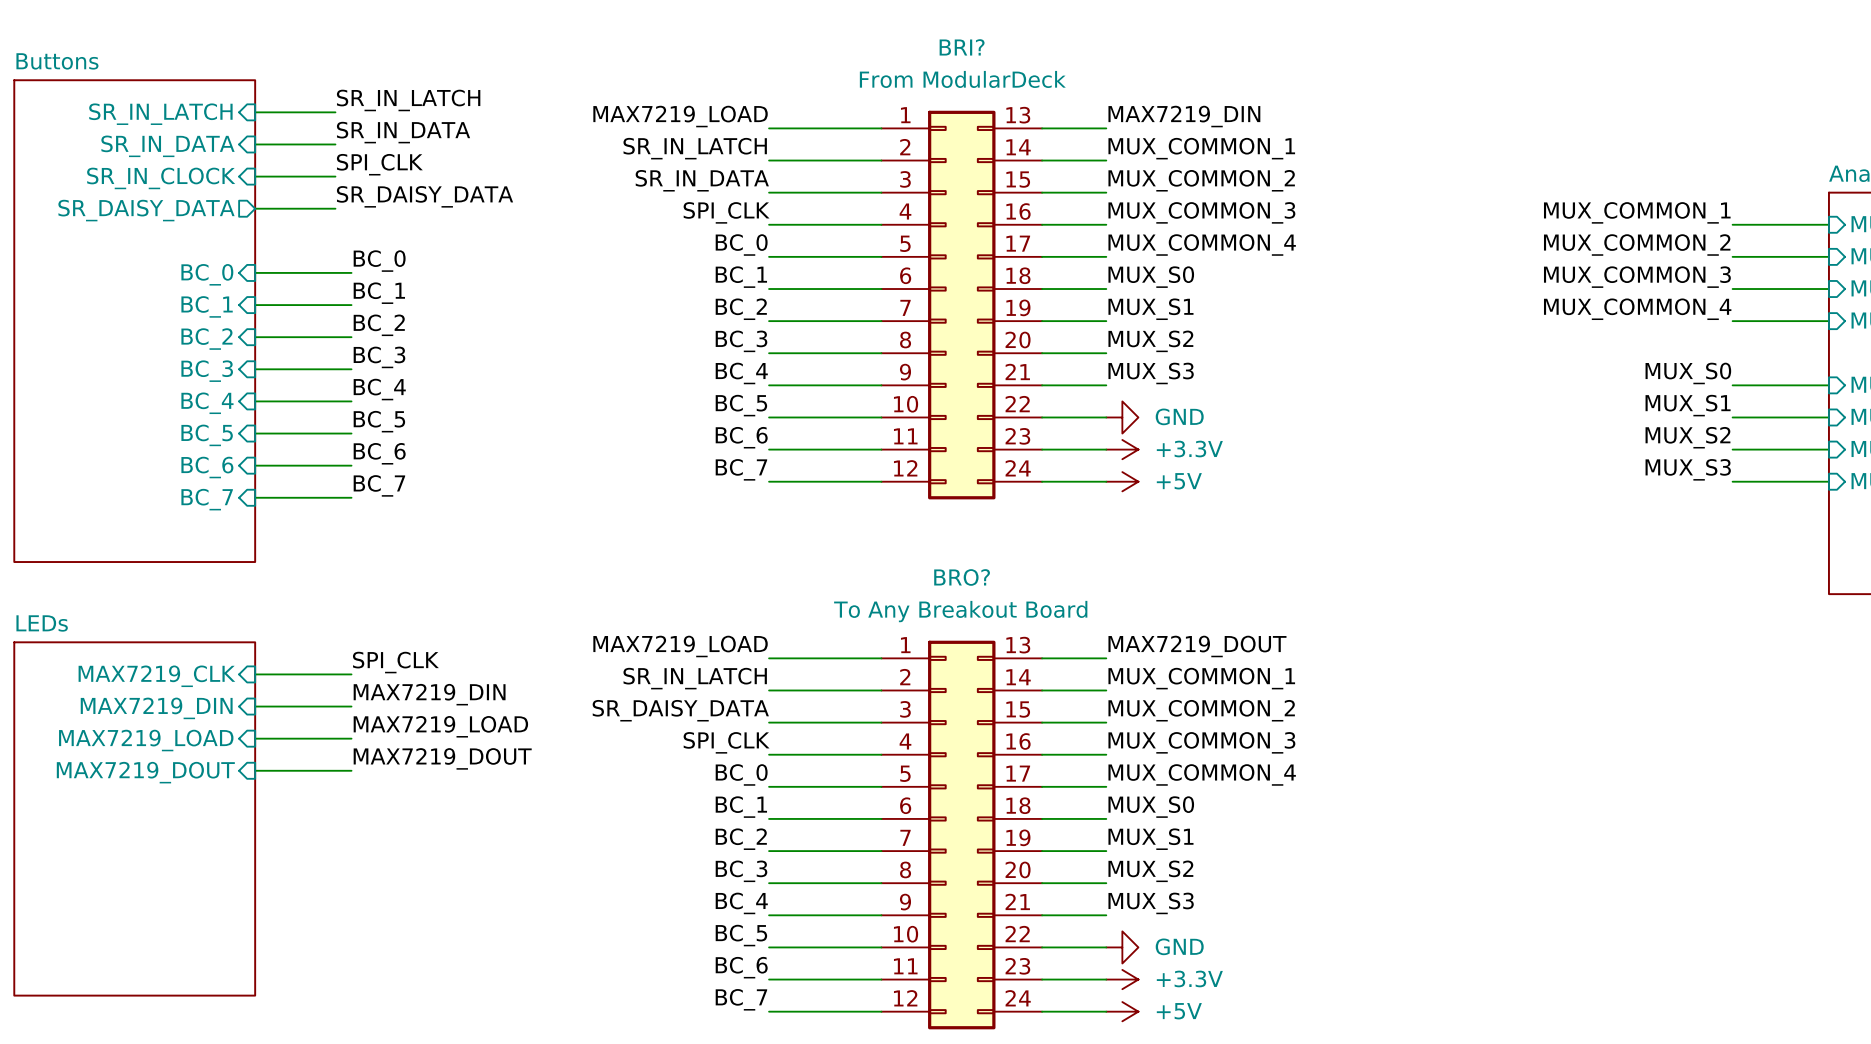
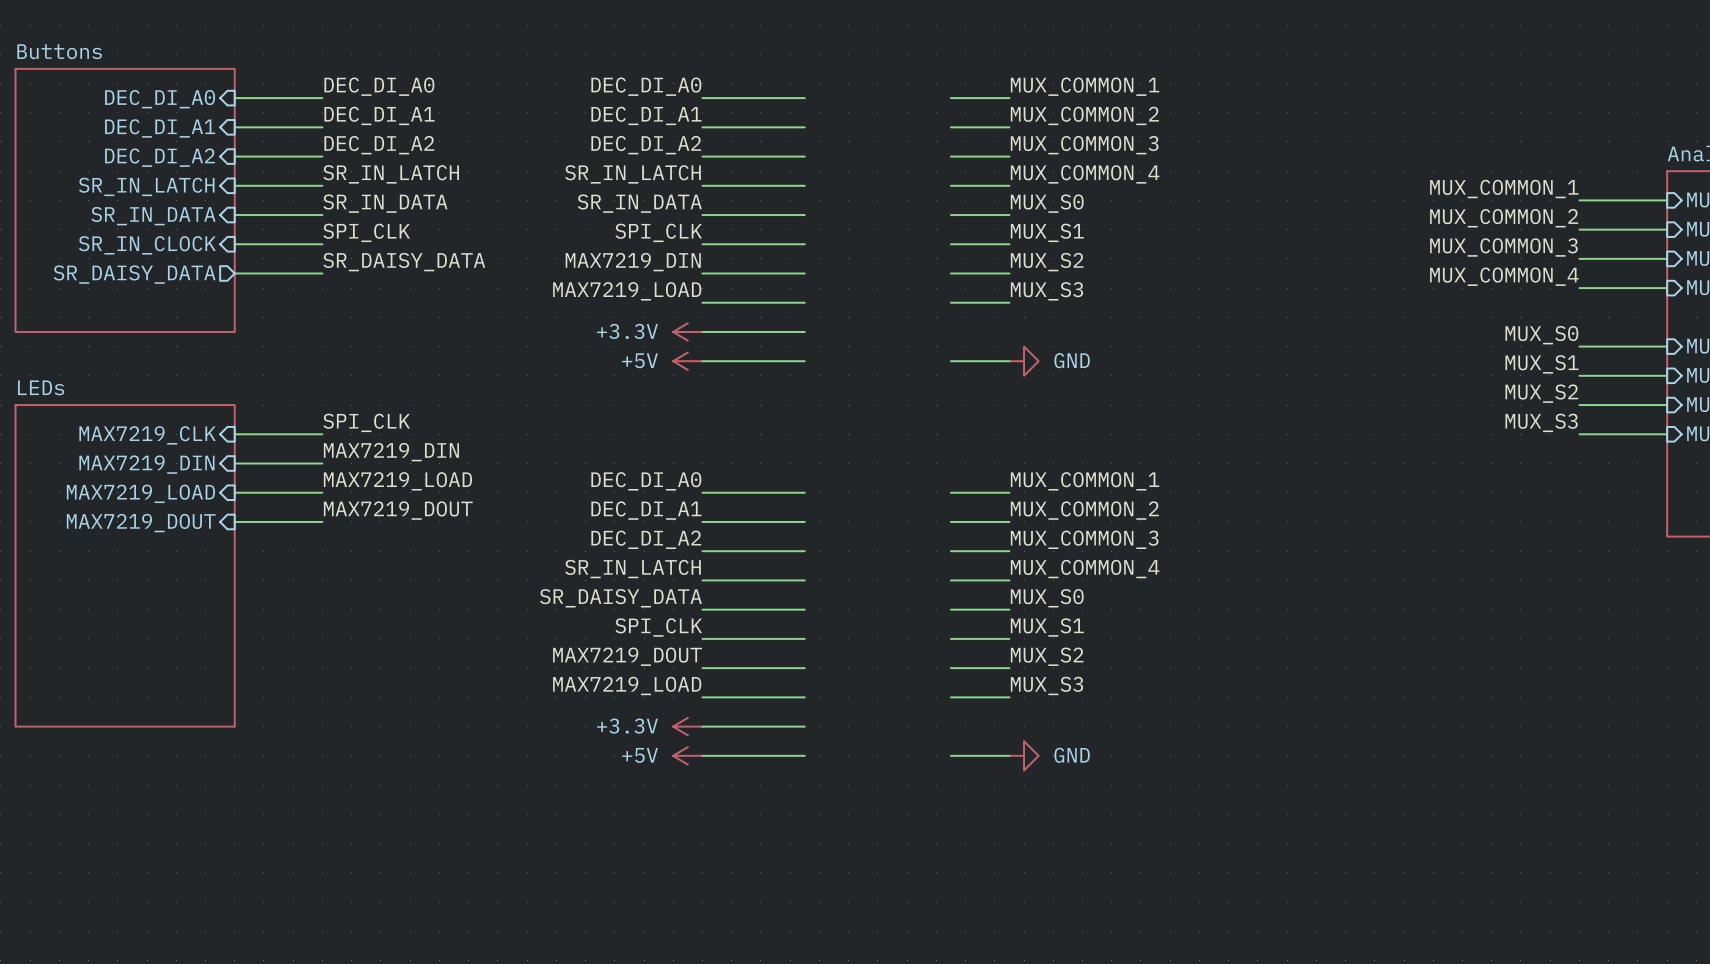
label position: SR_IN_LATCH (408, 100) -> SR_IN_LATCH (391, 174)
label: none -> DEC_DI_A0 (379, 86)
label: none -> DEC_DI_A0 (646, 86)
wire: none -> (307, 98) (322, 98)
sheet pin: SR_IN_LATCH (160, 114) -> DEC_DI_A0 (160, 99)
label: MAX7219_LOAD (680, 116) -> none
label: MAX7219_DIN (1184, 116) -> none
wire: (769, 128) (881, 128) -> none
wire: (1042, 128) (1106, 128) -> none
label position: SR_IN_DATA (403, 132) -> SR_IN_DATA (385, 203)
label: none -> DEC_DI_A1 (379, 115)
label: none -> DEC_DI_A1 (646, 115)
wire: none -> (307, 127) (322, 127)
sheet pin: SR_IN_DATA (167, 146) -> DEC_DI_A1 (160, 128)
label position: SR_IN_LATCH (695, 148) -> SR_IN_LATCH (633, 174)
label position: MUX_COMMON_1 (1201, 148) -> MUX_COMMON_1 (1085, 86)
wire: (769, 160) (881, 160) -> none
wire: (1042, 160) (1106, 160) -> none
label: SPI_CLK (379, 164) -> none
label: none -> DEC_DI_A2 (379, 145)
label: none -> DEC_DI_A2 (646, 145)
wire: none -> (307, 156) (322, 156)
sheet pin: SR_IN_CLOCK (161, 178) -> DEC_DI_A2 (159, 157)
label position: SR_IN_DATA (702, 180) -> SR_IN_DATA (639, 203)
label position: MUX_COMMON_2 (1201, 180) -> MUX_COMMON_2 (1084, 115)
wire: (769, 192) (881, 192) -> (702, 98) (804, 98)
wire: (1042, 192) (1106, 192) -> (950, 98) (1009, 98)
label: SR_DAISY_DATA (425, 196) -> none
wire: none -> (307, 185) (322, 185)
sheet pin shape: output (146, 210) -> input (146, 186)
sheet pin: SR_DAISY_DATA (146, 210) -> SR_IN_LATCH (146, 186)
label position: SPI_CLK (726, 212) -> SPI_CLK (658, 232)
label position: MUX_COMMON_3 (1201, 212) -> MUX_COMMON_3 (1084, 145)
sheet Buttons: none -> (125, 200)
wire: (769, 224) (881, 224) -> (702, 127) (804, 127)
wire: (1042, 224) (1106, 224) -> (950, 127) (1009, 127)
sheet pin: none -> SR_IN_DATA (153, 216)
label: BC_0 (741, 245) -> none
label position: MUX_COMMON_4 (1202, 245) -> MUX_COMMON_4 (1085, 174)
wire: (769, 256) (881, 256) -> (702, 156) (804, 156)
wire: (1042, 256) (1106, 256) -> (950, 156) (1009, 156)
label: BC_0 (379, 261) -> SPI_CLK (366, 232)
sheet pin: BC_0 (207, 274) -> SR_IN_CLOCK (147, 245)
label: BC_1 (741, 277) -> none
label position: MUX_S0 (1151, 277) -> MUX_S0 (1047, 203)
wire: (769, 289) (881, 289) -> (702, 185) (804, 185)
wire: (1042, 289) (1106, 289) -> (950, 185) (1009, 185)
label: BC_1 (379, 293) -> SR_DAISY_DATA (404, 262)
label: none -> MAX7219_DIN (633, 262)
BRI?: (961, 305) -> none
sheet pin shape: input (207, 306) -> output (134, 274)
sheet pin: BC_1 (207, 306) -> SR_DAISY_DATA (134, 274)
label: BC_2 (741, 309) -> none
label position: MUX_S1 (1150, 309) -> MUX_S1 (1047, 232)
sheet Buttons: (134, 321) -> none
wire: (769, 321) (881, 321) -> (702, 215) (804, 215)
wire: (1042, 321) (1106, 321) -> (950, 215) (1009, 215)
label: BC_2 (379, 325) -> none
label: none -> MAX7219_LOAD (627, 291)
wire: (255, 337) (351, 337) -> none
sheet pin: BC_2 (206, 339) -> none
label: BC_3 (741, 341) -> none
label position: MUX_S2 (1150, 341) -> MUX_S2 (1047, 262)
wire: (769, 353) (881, 353) -> (702, 244) (804, 244)
wire: (1042, 353) (1106, 353) -> (950, 244) (1009, 244)
label: BC_3 (379, 357) -> none
wire: (255, 369) (351, 369) -> (234, 215) (322, 215)
power symbol: none -> +3.3V (687, 331)
sheet pin: BC_3 (207, 371) -> none
label: BC_4 (741, 373) -> none
label position: MUX_S3 (1151, 373) -> MUX_S3 (1046, 291)
wire: (769, 385) (881, 385) -> (702, 273) (804, 273)
wire: (1042, 385) (1106, 385) -> (950, 273) (1009, 273)
label: BC_4 (379, 389) -> none
wire: (255, 401) (351, 401) -> (234, 521) (322, 521)
power symbol: none -> +5V (687, 361)
sheet pin: BC_4 (207, 403) -> none
label: BC_5 (741, 405) -> none
wire: (769, 417) (881, 417) -> (702, 302) (804, 302)
wire: (1042, 417) (1106, 417) -> (950, 302) (1009, 302)
power symbol position: GND (1122, 417) -> GND (1024, 361)
label: BC_5 (379, 421) -> none
wire: (255, 433) (351, 433) -> (234, 492) (322, 492)
sheet pin: BC_5 (207, 435) -> none
label: BC_6 (741, 437) -> none
wire: (769, 449) (881, 449) -> (702, 331) (804, 331)
wire: (1042, 449) (1106, 449) -> (950, 492) (1009, 492)
power symbol: +3.3V (1122, 449) -> none
label: BC_6 (379, 453) -> none
wire: (255, 465) (351, 465) -> (234, 463) (322, 463)
sheet pin: BC_6 (207, 467) -> none
label: none -> SPI_CLK (366, 422)
label: BC_7 (741, 469) -> none
wire: (769, 481) (881, 481) -> (702, 361) (804, 361)
wire: (1042, 481) (1106, 481) -> (950, 361) (1009, 361)
power symbol: +5V (1122, 481) -> none
label: BC_7 (379, 485) -> none
wire: (255, 497) (351, 497) -> (234, 434) (322, 434)
sheet pin: BC_7 (207, 499) -> none
label: none -> DEC_DI_A0 (646, 481)
wire: none -> (702, 492) (804, 492)
label: none -> DEC_DI_A1 (646, 510)
label: none -> DEC_DI_A2 (646, 539)
label position: MAX7219_LOAD (680, 646) -> MAX7219_LOAD (627, 685)
label: MAX7219_DOUT (1197, 646) -> none
wire: (769, 658) (881, 658) -> (702, 521) (804, 521)
wire: (1042, 658) (1106, 658) -> (950, 521) (1009, 521)
label: SPI_CLK (395, 662) -> none
wire: (255, 674) (351, 674) -> none
sheet pin position: MAX7219_CLK (156, 676) -> MAX7219_CLK (147, 435)
label position: SR_IN_LATCH (695, 678) -> SR_IN_LATCH (633, 569)
label position: MUX_COMMON_1 (1201, 678) -> MUX_COMMON_1 (1085, 481)
wire: (769, 690) (881, 690) -> (702, 551) (804, 551)
wire: (1042, 690) (1106, 690) -> (950, 551) (1009, 551)
label position: MAX7219_DIN (429, 694) -> MAX7219_DIN (391, 452)
wire: (255, 706) (351, 706) -> none
sheet pin position: MAX7219_DIN (156, 708) -> MAX7219_DIN (146, 464)
label position: SR_DAISY_DATA (680, 710) -> SR_DAISY_DATA (620, 598)
label position: MUX_COMMON_2 (1201, 710) -> MUX_COMMON_2 (1084, 510)
wire: (769, 722) (881, 722) -> (702, 580) (804, 580)
wire: (1042, 722) (1106, 722) -> (950, 580) (1009, 580)
label position: MAX7219_LOAD (440, 726) -> MAX7219_LOAD (397, 481)
label: none -> MAX7219_DOUT (627, 656)
wire: (255, 738) (351, 738) -> none
sheet pin position: MAX7219_LOAD (146, 740) -> MAX7219_LOAD (140, 493)
label position: SPI_CLK (726, 742) -> SPI_CLK (658, 627)
label position: MUX_COMMON_3 (1201, 742) -> MUX_COMMON_3 (1084, 539)
wire: (769, 754) (881, 754) -> (702, 609) (804, 609)
wire: (1042, 754) (1106, 754) -> (950, 609) (1009, 609)
label position: MAX7219_DOUT (442, 758) -> MAX7219_DOUT (398, 510)
wire: (255, 770) (351, 770) -> none
sheet pin position: MAX7219_DOUT (145, 772) -> MAX7219_DOUT (141, 523)
label: BC_0 (741, 774) -> none
label position: MUX_COMMON_4 (1202, 774) -> MUX_COMMON_4 (1085, 569)
wire: (769, 786) (881, 786) -> (702, 638) (804, 638)
wire: (1042, 786) (1106, 786) -> (950, 638) (1009, 638)
power symbol: none -> +3.3V (687, 726)
label: BC_1 (741, 807) -> none
label position: MUX_S0 (1151, 807) -> MUX_S0 (1047, 598)
sheet LEDs position: (134, 818) -> (125, 565)
wire: (769, 818) (881, 818) -> (702, 668) (804, 668)
wire: (1042, 818) (1106, 818) -> (950, 668) (1009, 668)
power symbol: none -> +5V (687, 755)
BRO?: (961, 835) -> none
label: BC_2 (741, 839) -> none
label position: MUX_S1 (1150, 839) -> MUX_S1 (1047, 627)
wire: (769, 851) (881, 851) -> (702, 697) (804, 697)
wire: (1042, 851) (1106, 851) -> (950, 697) (1009, 697)
label: BC_3 (741, 871) -> none
label position: MUX_S2 (1150, 871) -> MUX_S2 (1047, 656)
wire: (769, 883) (881, 883) -> (702, 726) (804, 726)
wire: (1042, 883) (1106, 883) -> none
label: BC_4 (741, 903) -> none
label position: MUX_S3 (1151, 903) -> MUX_S3 (1046, 685)
wire: (769, 915) (881, 915) -> (702, 755) (804, 755)
wire: (1042, 915) (1106, 915) -> (950, 755) (1009, 755)
label: BC_5 (741, 935) -> none
wire: (769, 947) (881, 947) -> none
wire: (1042, 947) (1106, 947) -> none
power symbol position: GND (1122, 947) -> GND (1024, 755)
label: BC_6 (741, 967) -> none
wire: (769, 979) (881, 979) -> none
wire: (1042, 979) (1106, 979) -> none
power symbol: +3.3V (1122, 979) -> none
label: BC_7 (741, 999) -> none
wire: (769, 1011) (881, 1011) -> none
wire: (1042, 1011) (1106, 1011) -> none
power symbol: +5V (1122, 1011) -> none

